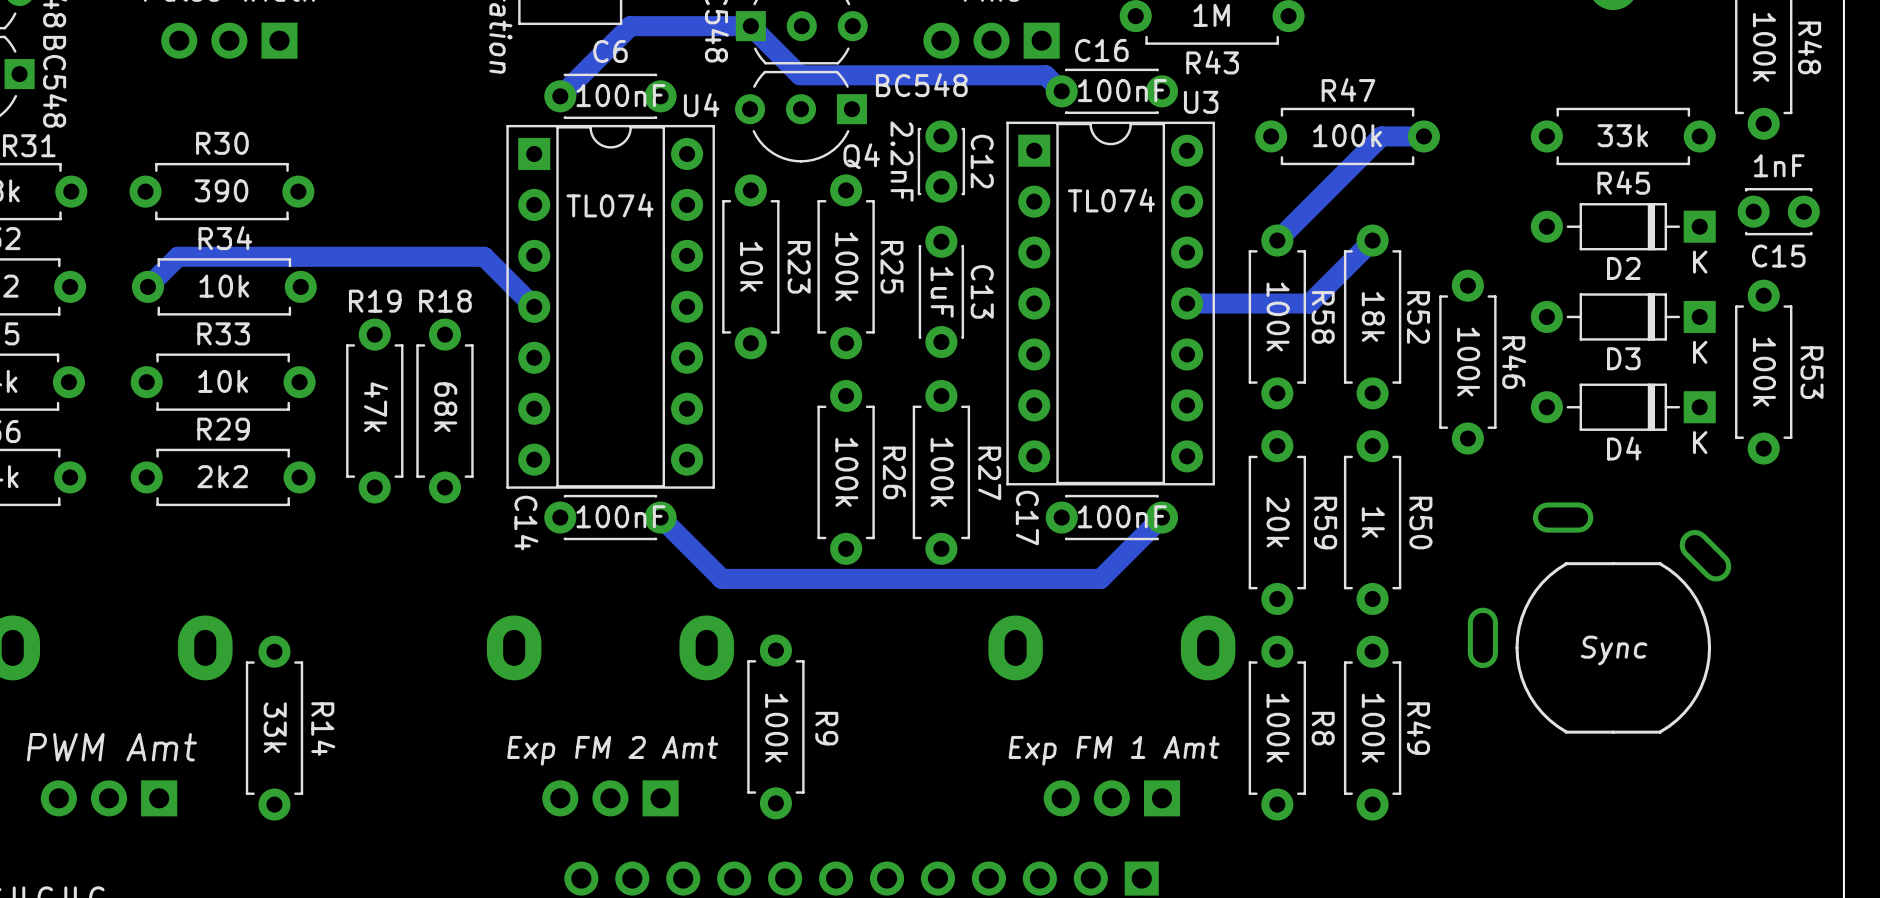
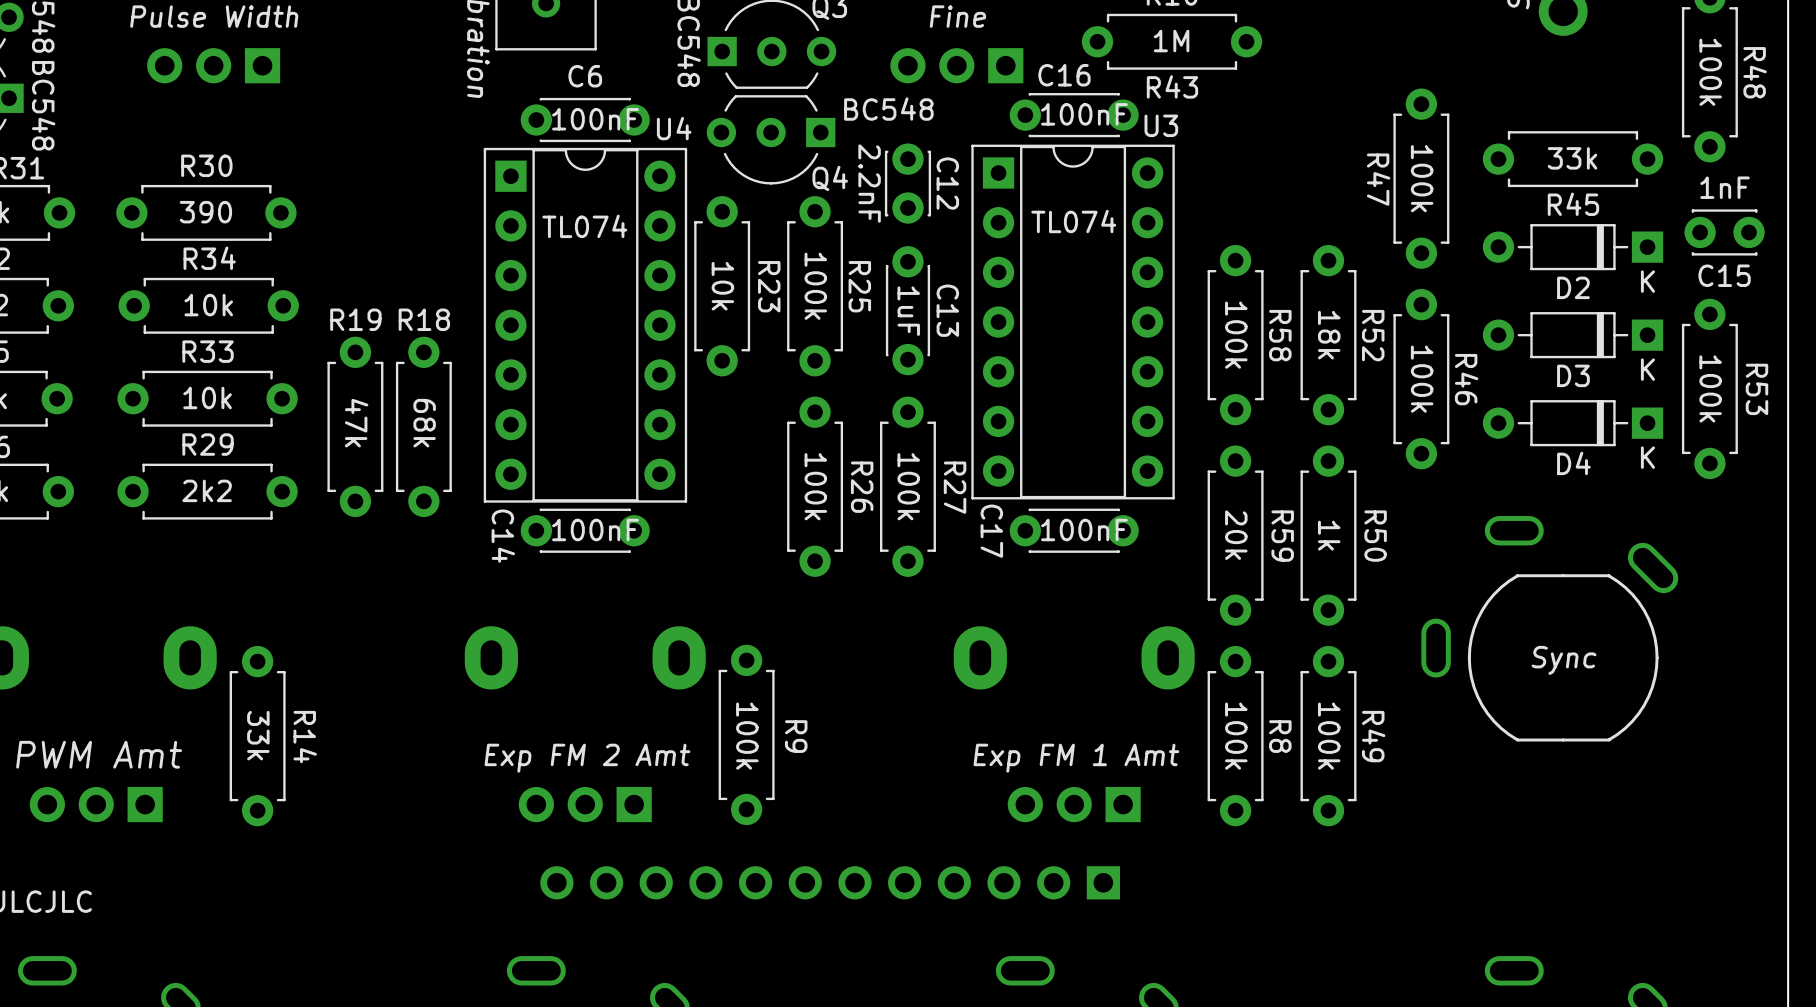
R47 name position: R47 (1348, 90) -> R47 (1378, 179)
track: (1061, 91) (1045, 75) (799, 75) (750, 26) (630, 26) (560, 96) -> none
R47 rotation: 0° (1347, 136) -> 90° clockwise (1421, 178)
R47 position: (1347, 136) -> (1421, 178)
track: (1423, 136) (1381, 136) (1277, 240) -> none
track: (1372, 240) (1309, 303) (1187, 303) -> none
track: (147, 286) (178, 256) (484, 256) (534, 306) -> none
track: (1162, 517) (1100, 578) (721, 578) (660, 517) -> none

